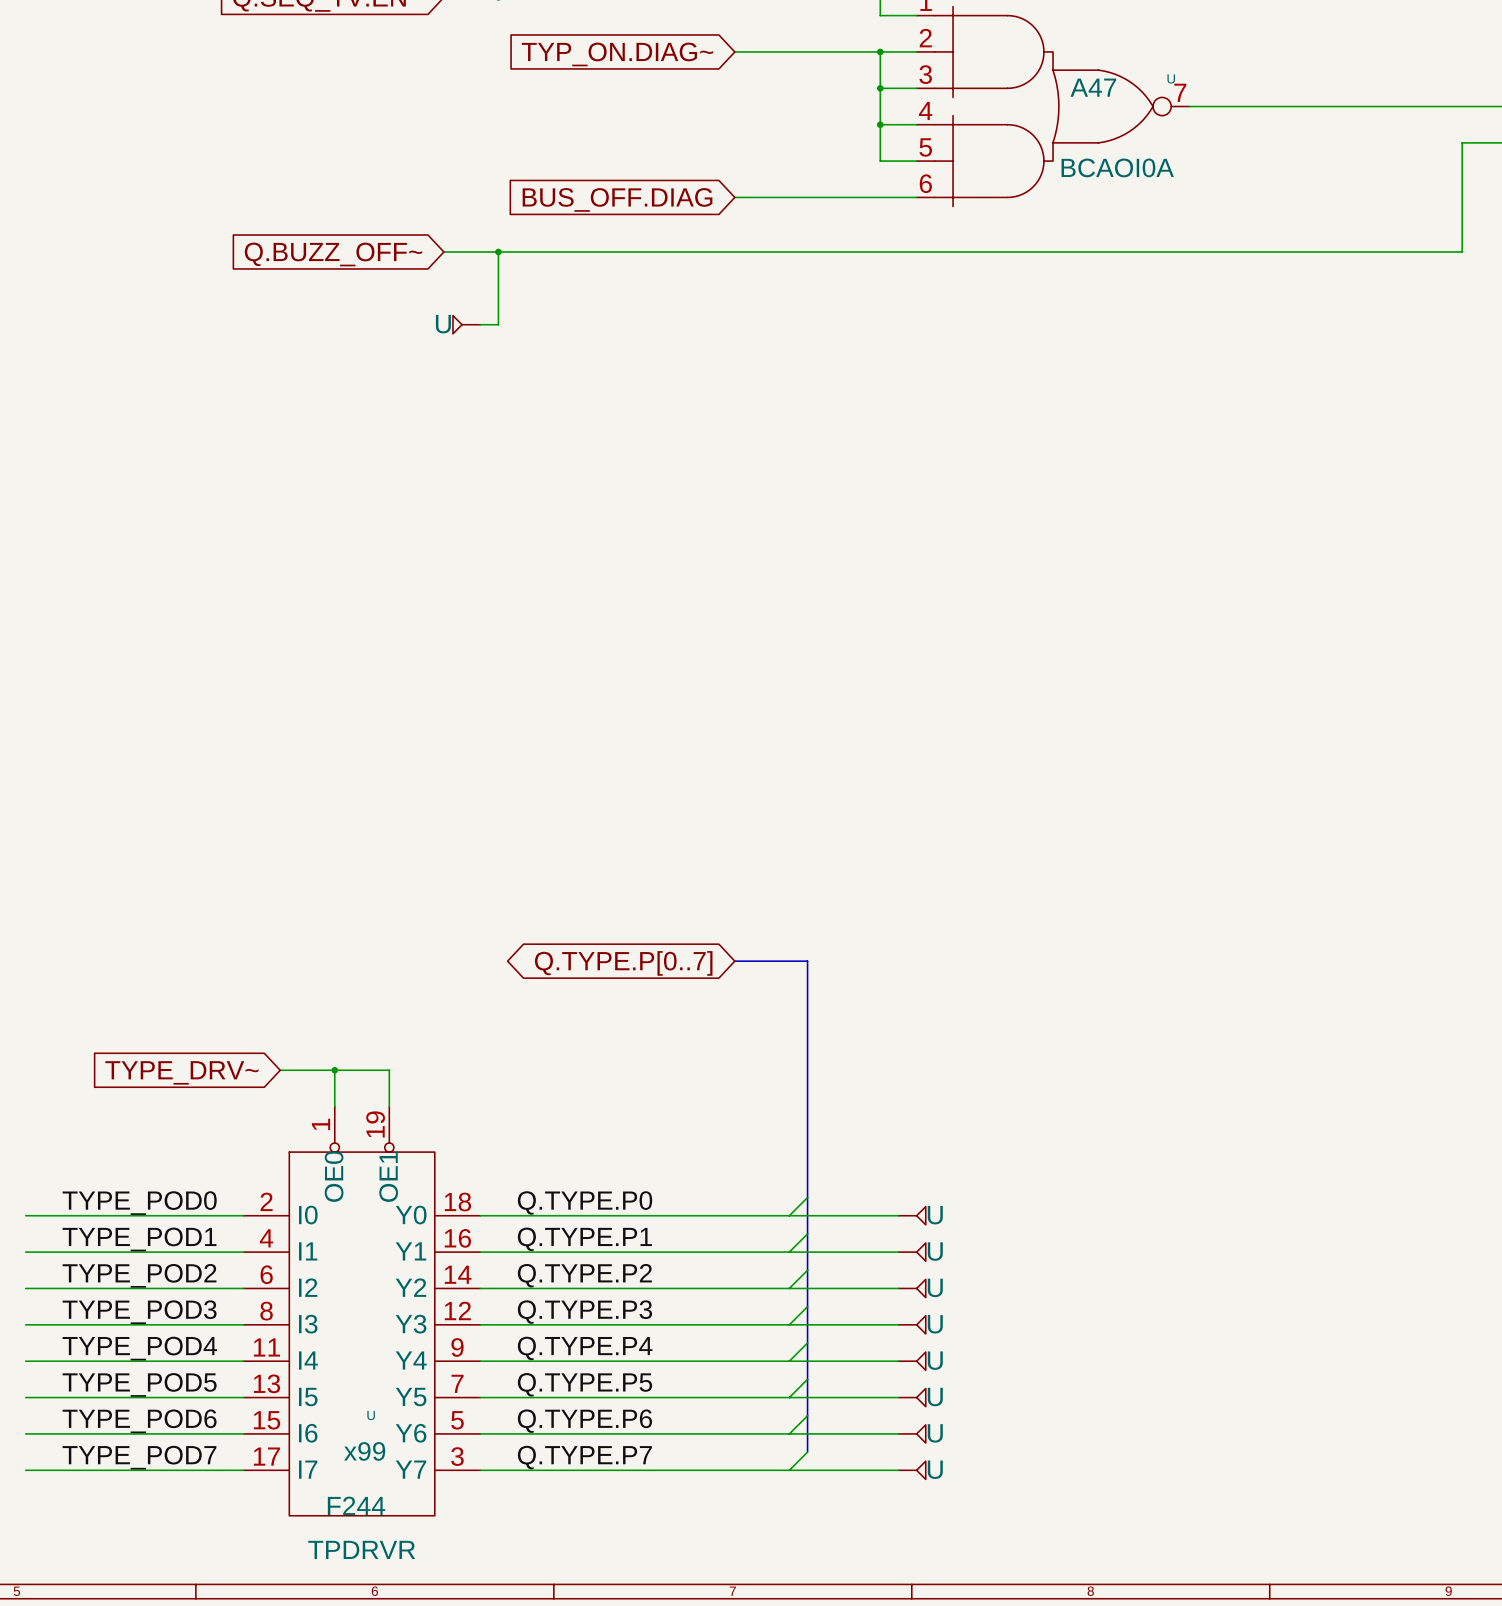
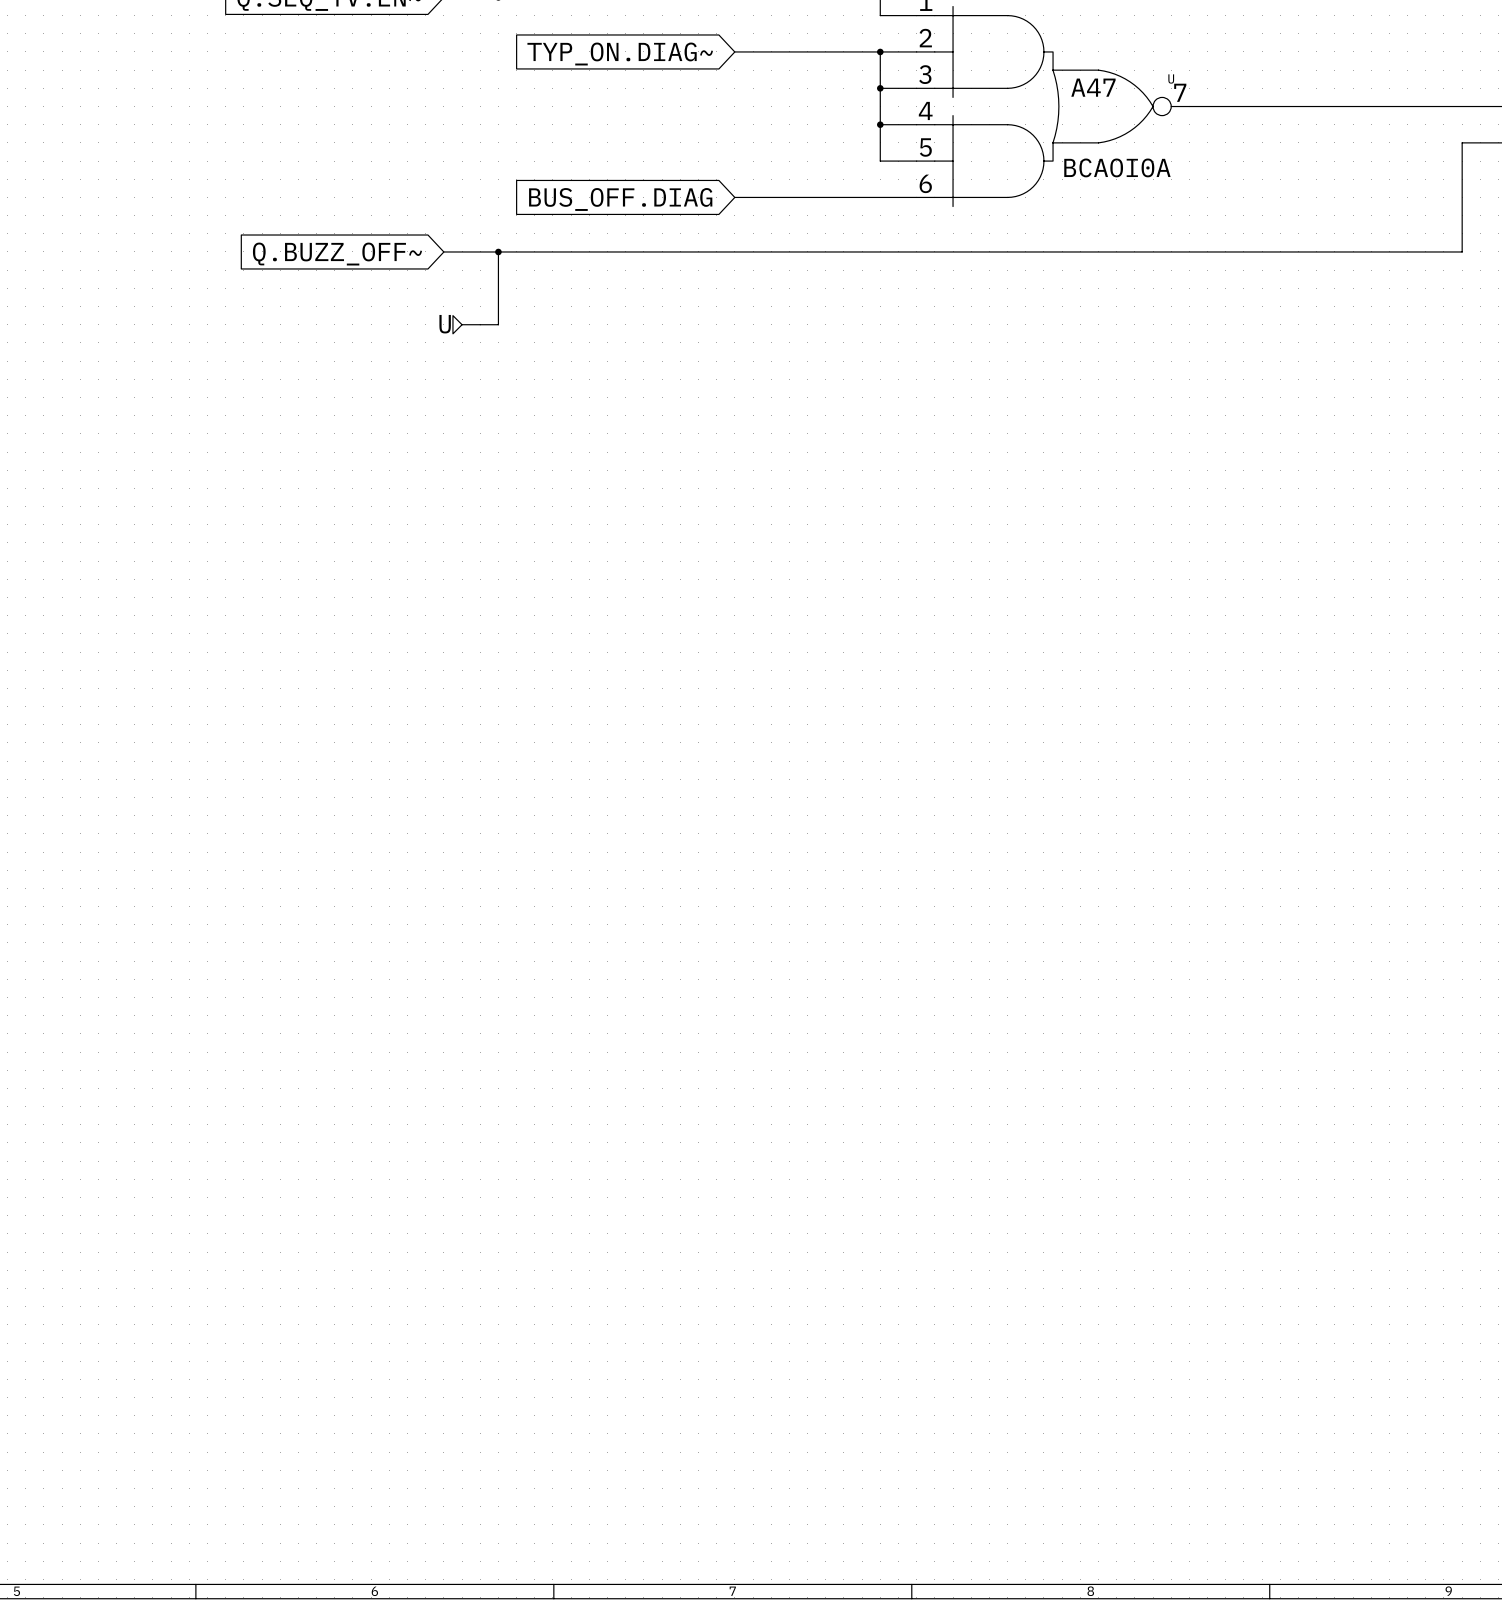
bus: (734, 961) (807, 961) (807, 1452) -> none
global label: Q.TYPE.P[0..7] (623, 963) -> none
wire: (280, 1070) (389, 1070) (389, 1106) -> none
wire: (334, 1070) (334, 1106) -> none
junction: (334, 1070) -> none
global label: TYPE_DRV~ (181, 1072) -> none
wire: (807, 1197) (789, 1215) -> none
label: Q.TYPE.P0 (585, 1202) -> none
label: TYPE_POD0 (139, 1203) -> none
wire: (25, 1215) (243, 1215) -> none
wire: (480, 1215) (898, 1215) -> none
U: (912, 1215) -> none
wire: (807, 1233) (789, 1252) -> none
label: TYPE_POD1 (139, 1239) -> none
label: Q.TYPE.P1 (584, 1239) -> none
wire: (25, 1252) (243, 1252) -> none
wire: (480, 1252) (898, 1252) -> none
U: (912, 1252) -> none
wire: (807, 1270) (789, 1288) -> none
label: TYPE_POD2 (139, 1275) -> none
label: Q.TYPE.P2 (584, 1275) -> none
wire: (25, 1288) (243, 1288) -> none
wire: (480, 1288) (898, 1288) -> none
U: (912, 1288) -> none
wire: (807, 1306) (789, 1324) -> none
U: F244 (362, 1311) -> none
label: TYPE_POD3 (139, 1312) -> none
label: Q.TYPE.P3 (584, 1312) -> none
wire: (25, 1324) (243, 1324) -> none
wire: (480, 1324) (898, 1324) -> none
U: (912, 1324) -> none
wire: (807, 1343) (789, 1361) -> none
label: TYPE_POD4 (139, 1348) -> none
label: Q.TYPE.P4 (585, 1348) -> none
wire: (25, 1361) (243, 1361) -> none
wire: (480, 1361) (898, 1361) -> none
U: (912, 1361) -> none
wire: (807, 1379) (789, 1397) -> none
label: TYPE_POD5 (139, 1384) -> none
label: Q.TYPE.P5 (584, 1384) -> none
wire: (25, 1397) (243, 1397) -> none
wire: (480, 1397) (898, 1397) -> none
U: (912, 1397) -> none
wire: (807, 1415) (789, 1433) -> none
label: TYPE_POD6 (139, 1421) -> none
label: Q.TYPE.P6 (584, 1421) -> none
wire: (25, 1433) (243, 1433) -> none
wire: (480, 1433) (898, 1433) -> none
U: (912, 1433) -> none
wire: (807, 1452) (789, 1470) -> none
label: TYPE_POD7 (139, 1457) -> none
label: Q.TYPE.P7 (584, 1457) -> none
wire: (25, 1470) (243, 1470) -> none
wire: (480, 1470) (898, 1470) -> none
U: (912, 1470) -> none

